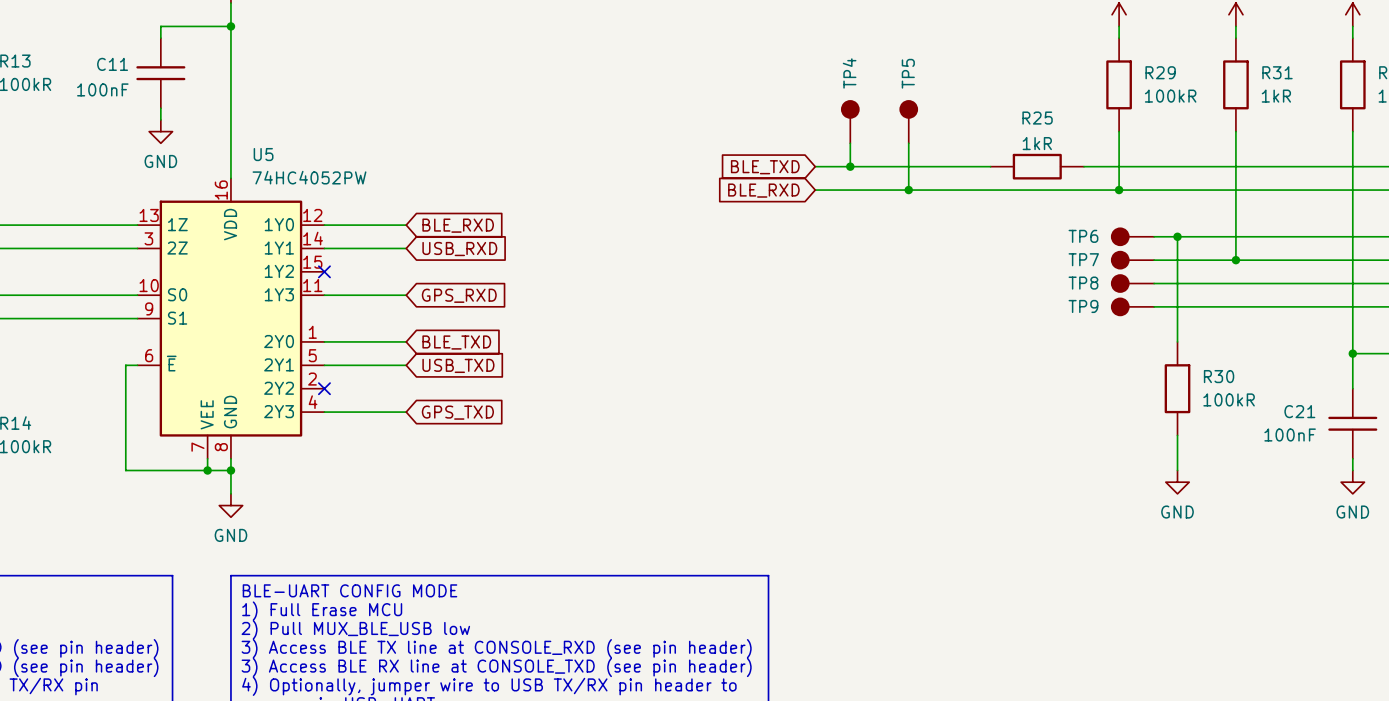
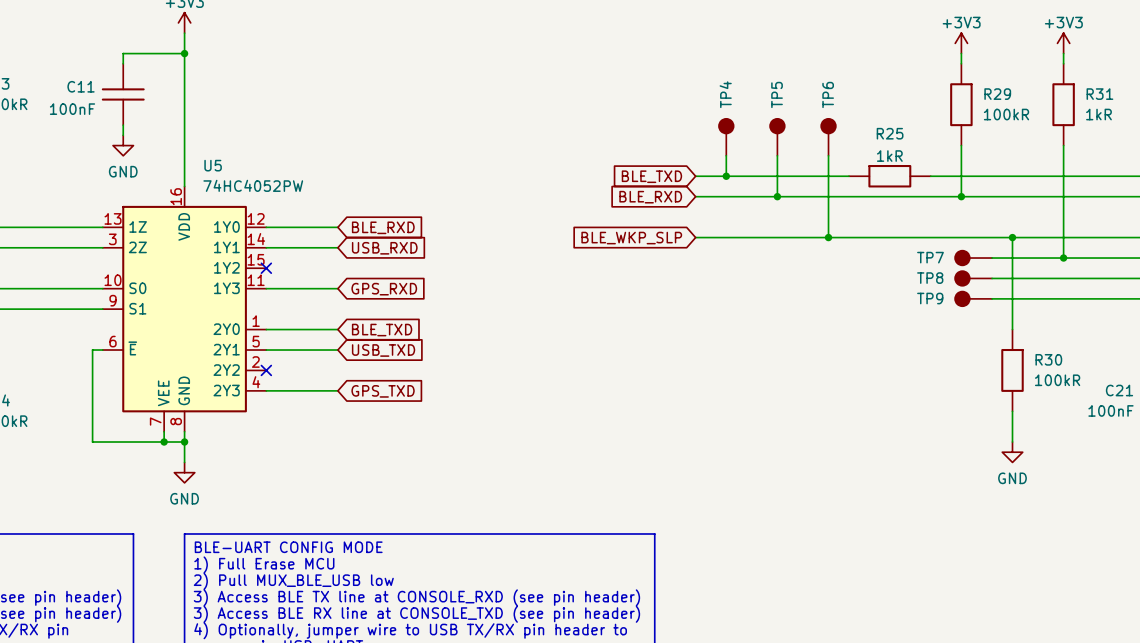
wire: none -> (828, 155) (828, 237)
wire: none -> (695, 237) (992, 237)
junction: none -> (828, 237)
TP6 rotation: 0° (1120, 236) -> 90° clockwise (828, 126)
TP6 position: (1132, 236) -> (828, 136)
global label: none -> BLE_WKP_SLP (631, 238)

